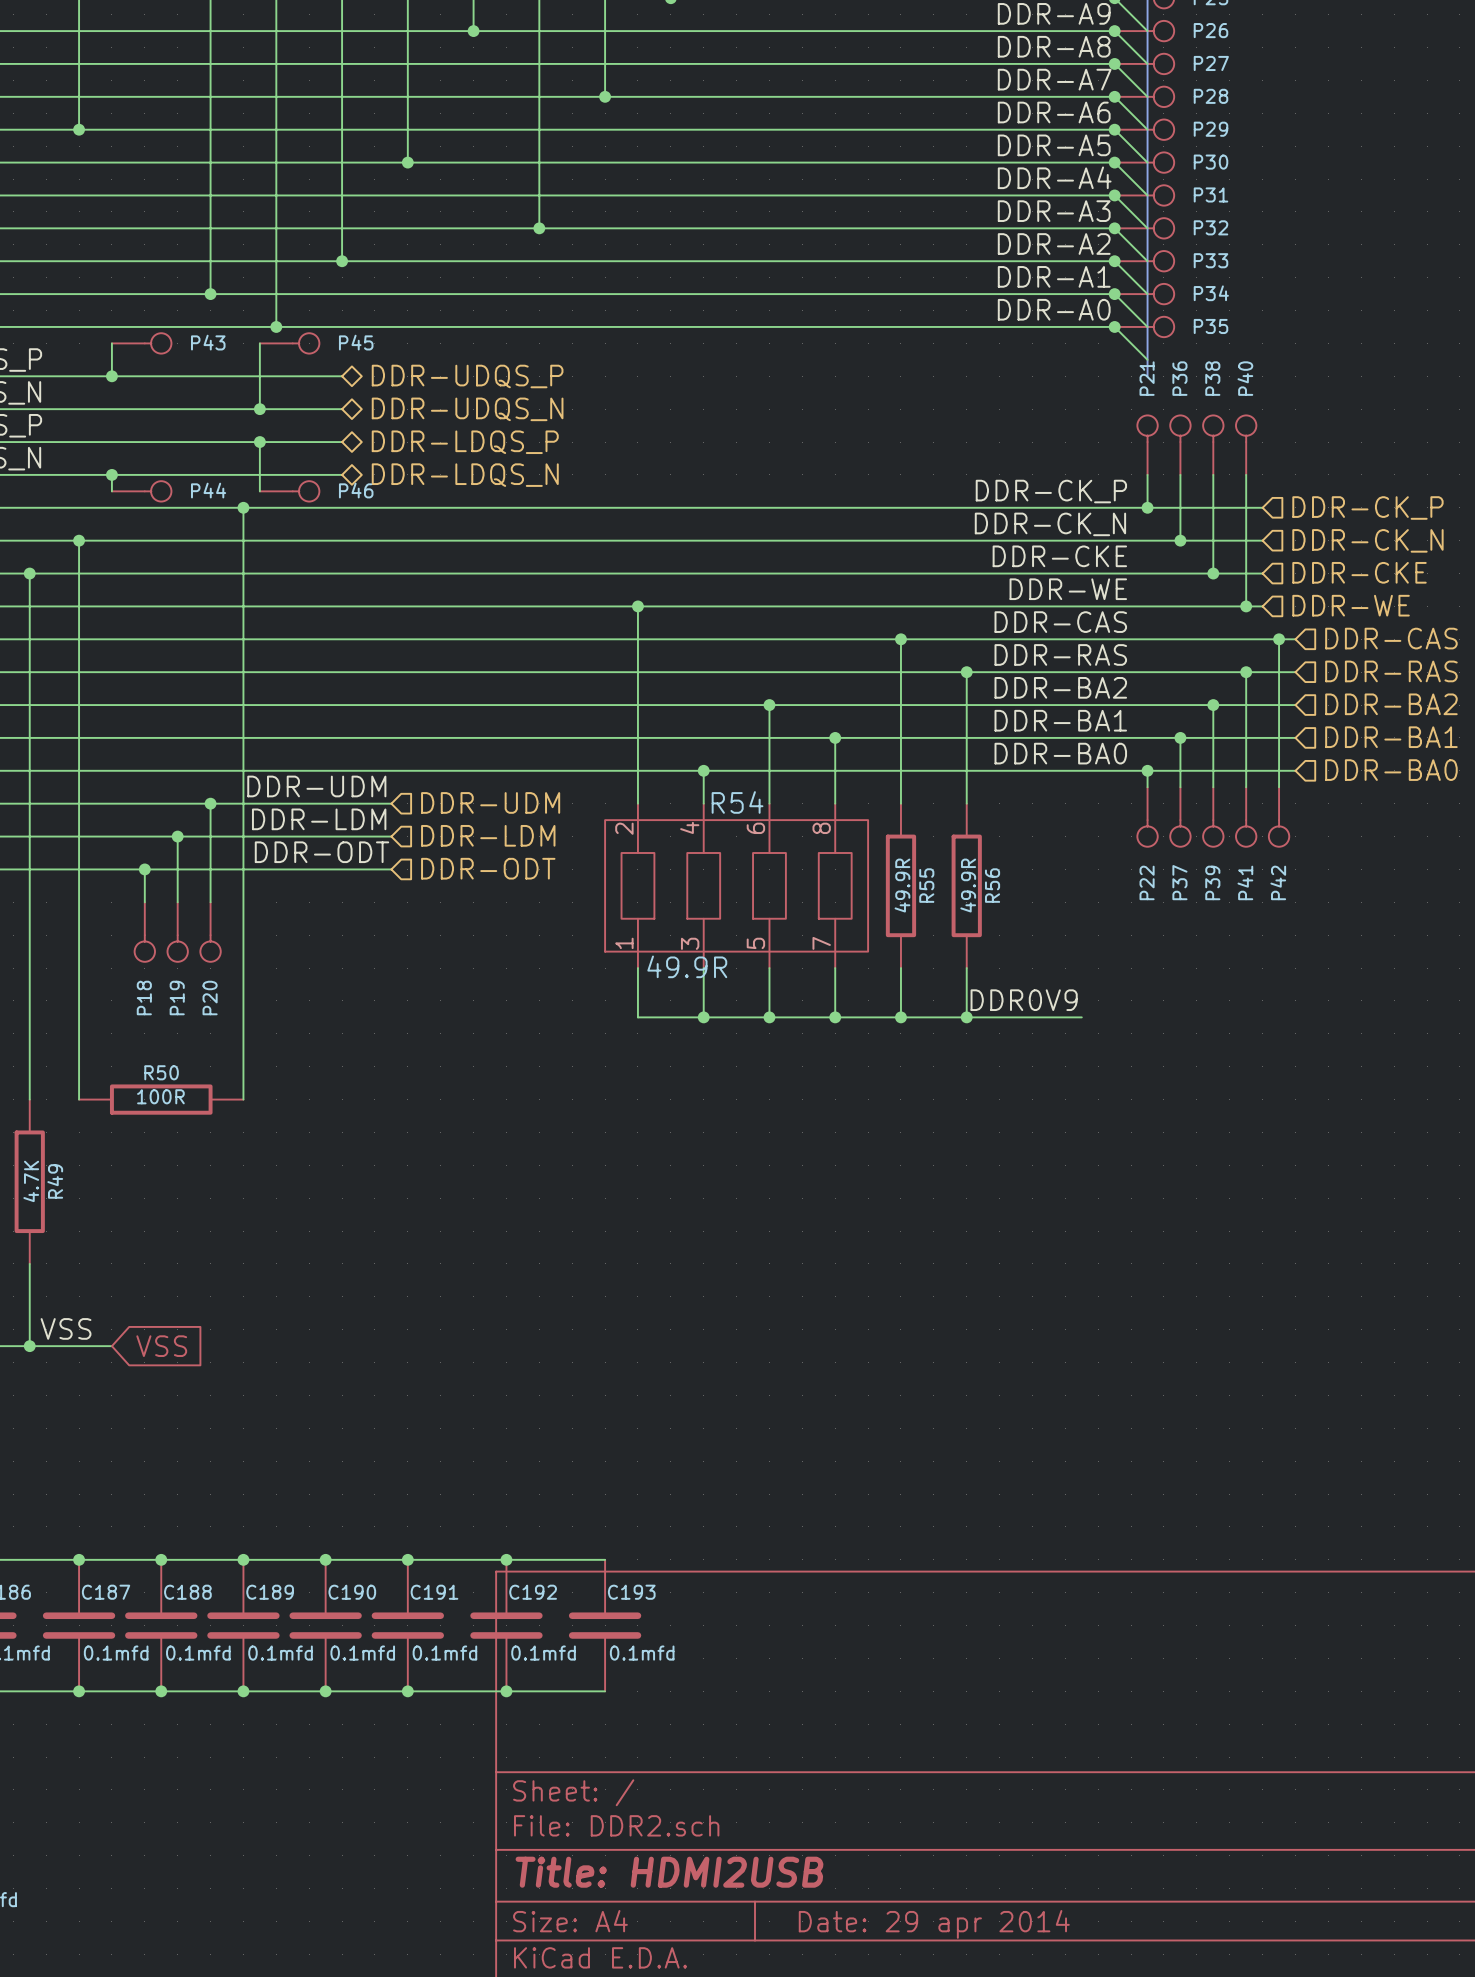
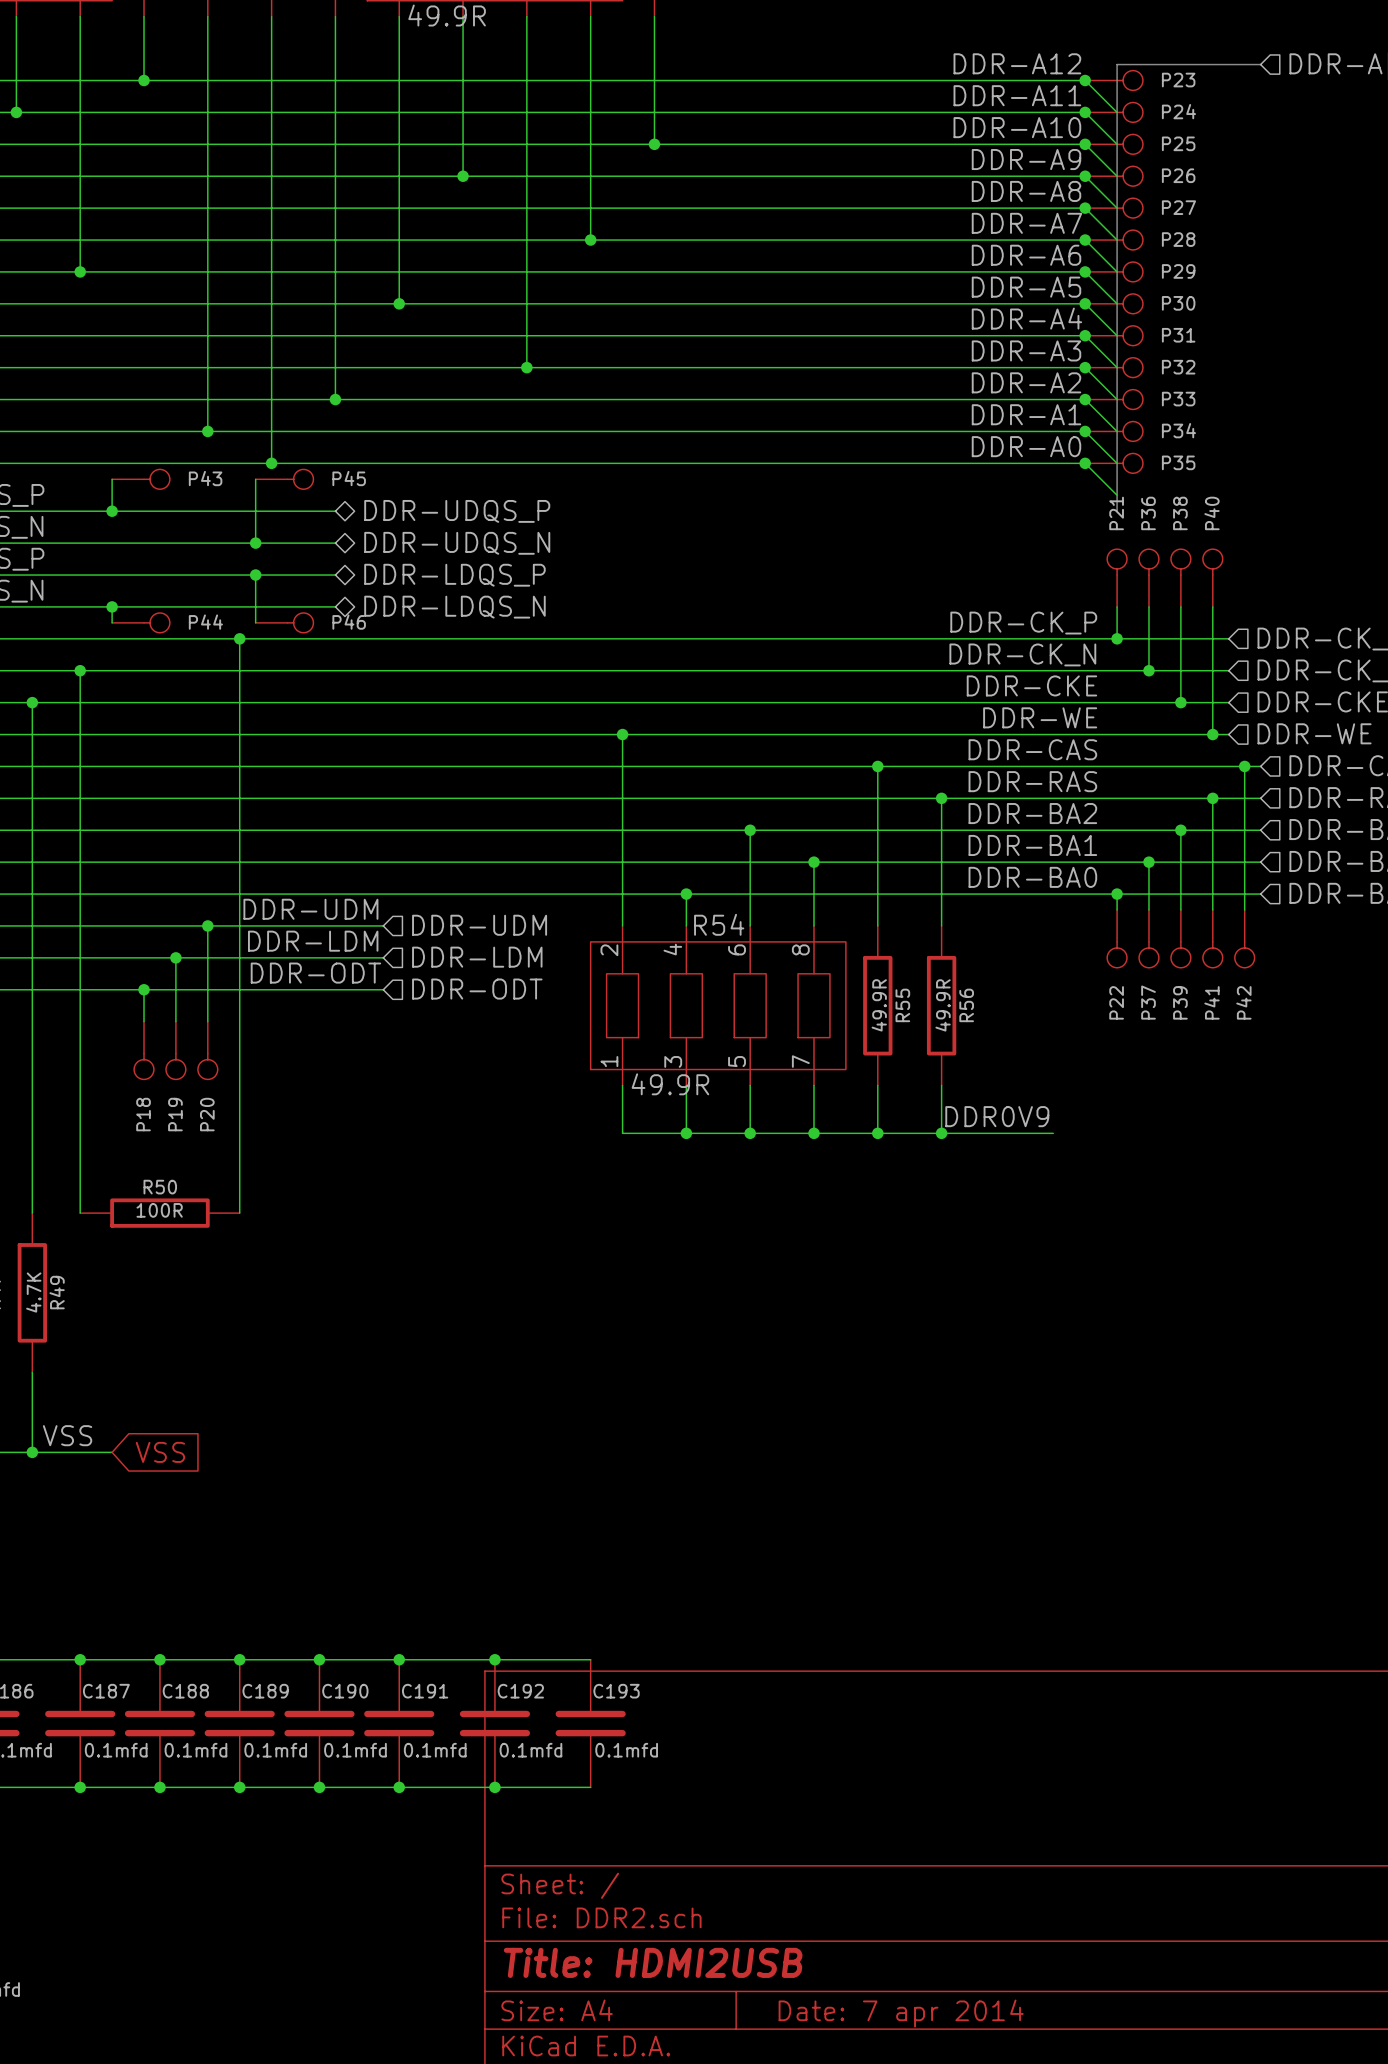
title block: Date: 29 apr 2014 (934, 1924) -> Date: 7 apr 2014 (901, 2013)

